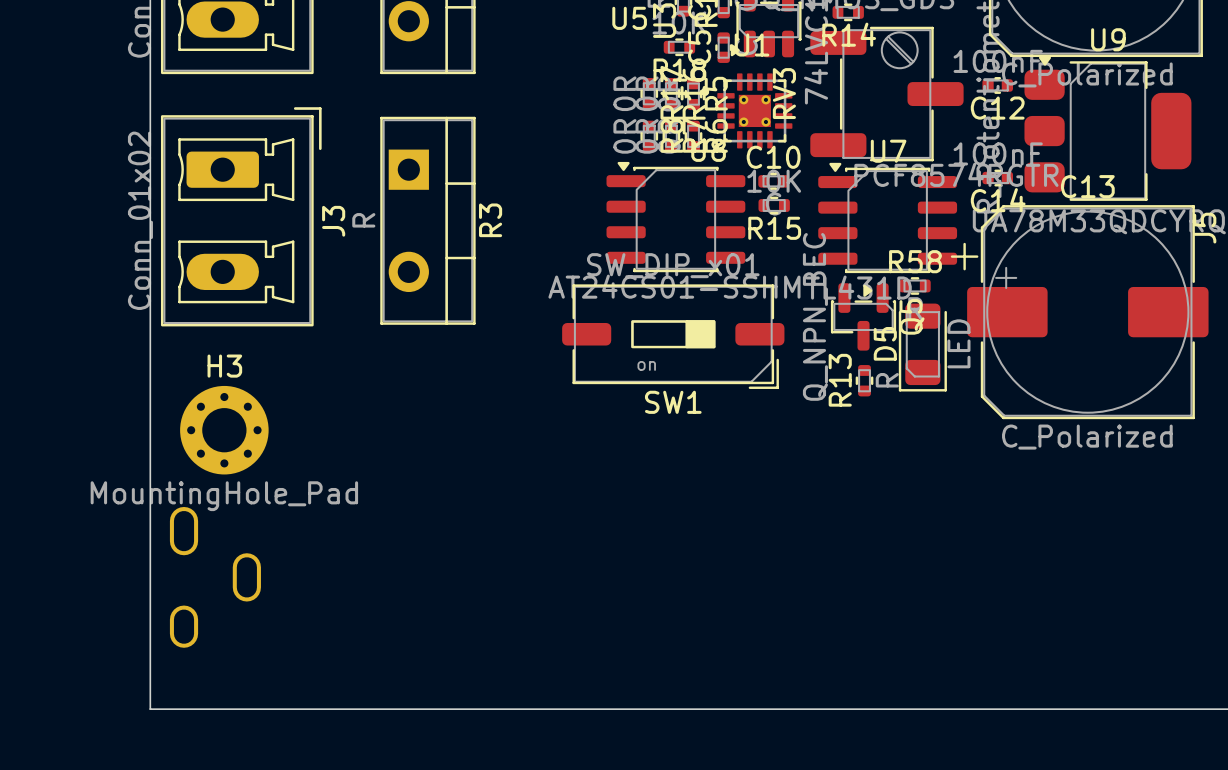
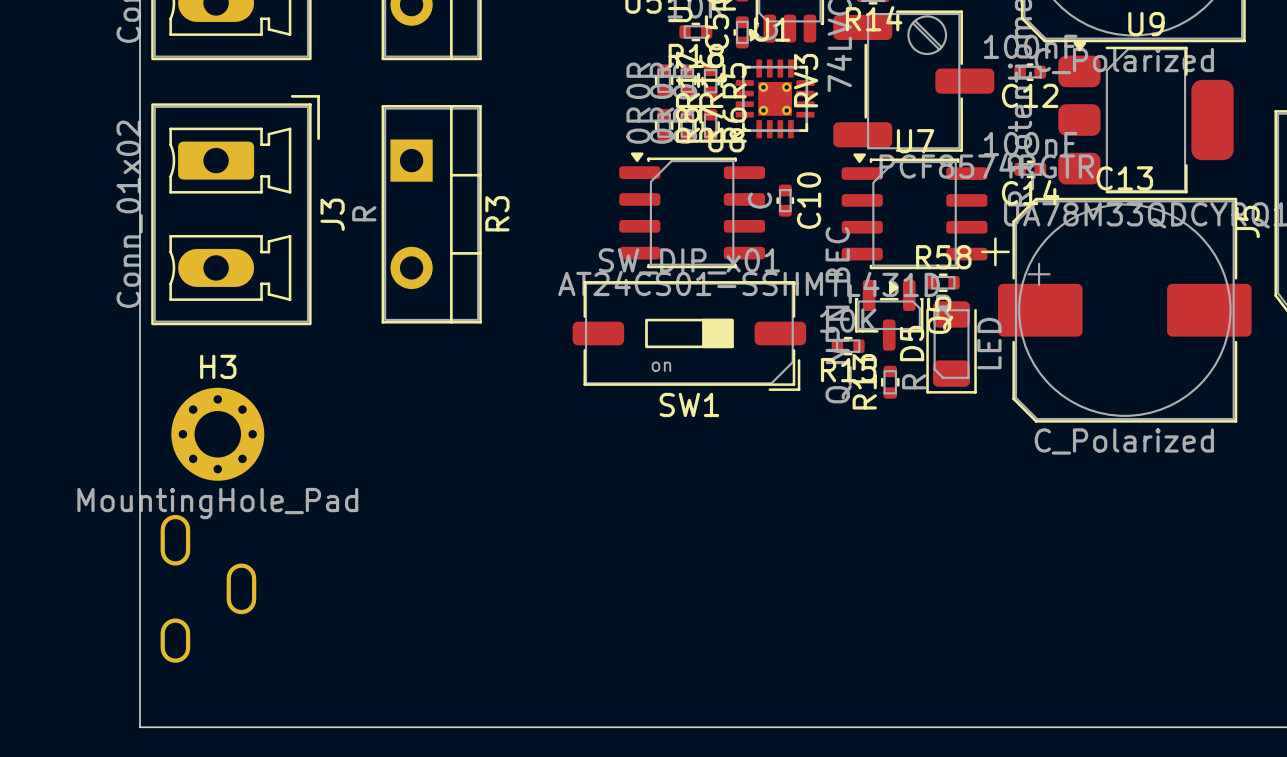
C10 rotation: 0° (773, 181) -> 90° clockwise (785, 200)
C10 position: (773, 181) -> (785, 200)
R15 position: (774, 205) -> (848, 346)

